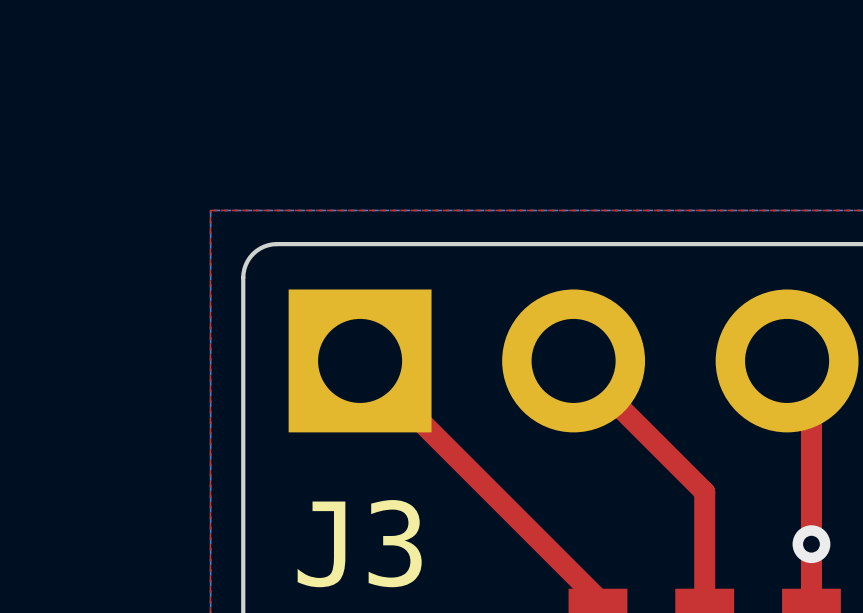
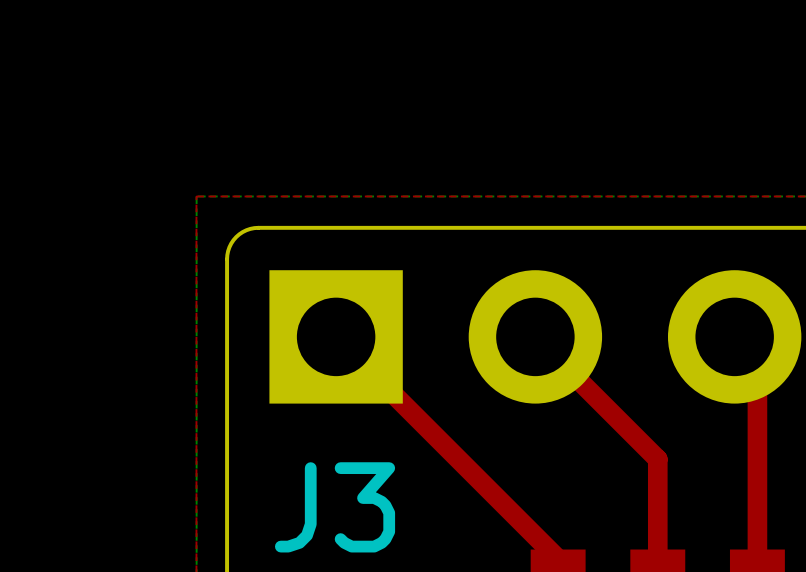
via: (811, 544) -> none

